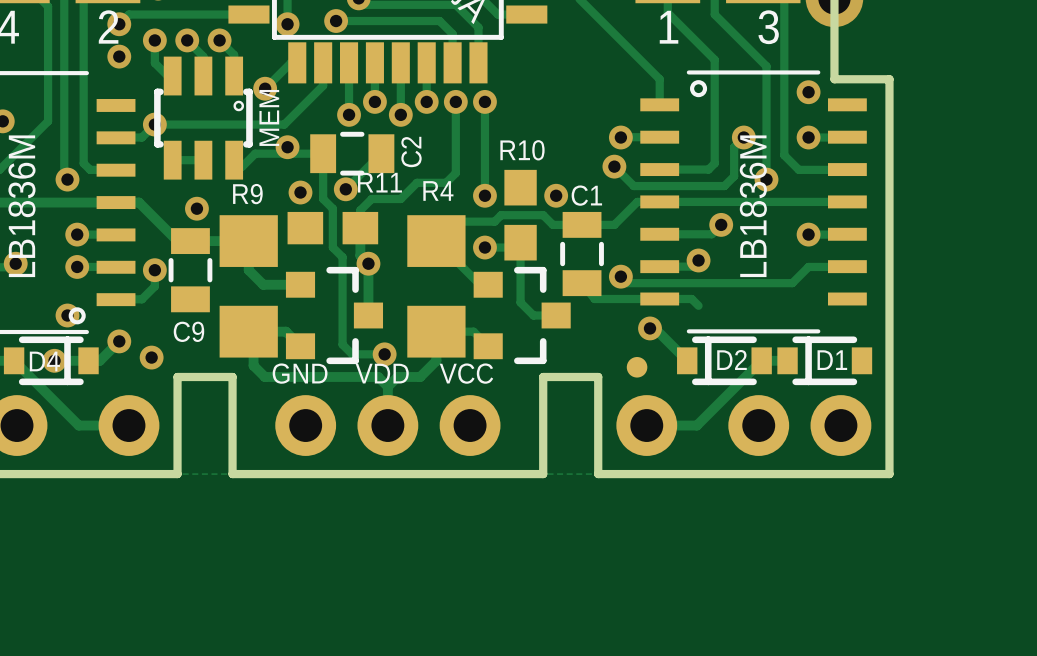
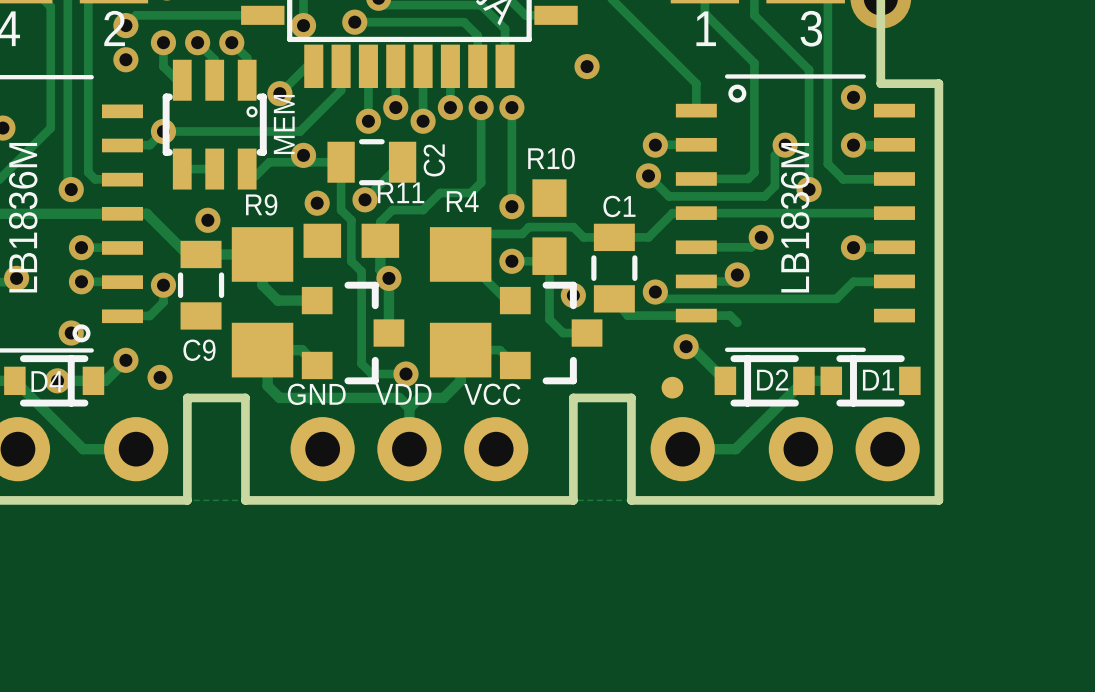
via: none -> (587, 66)
via: (556, 195) -> none
via: none -> (573, 295)

